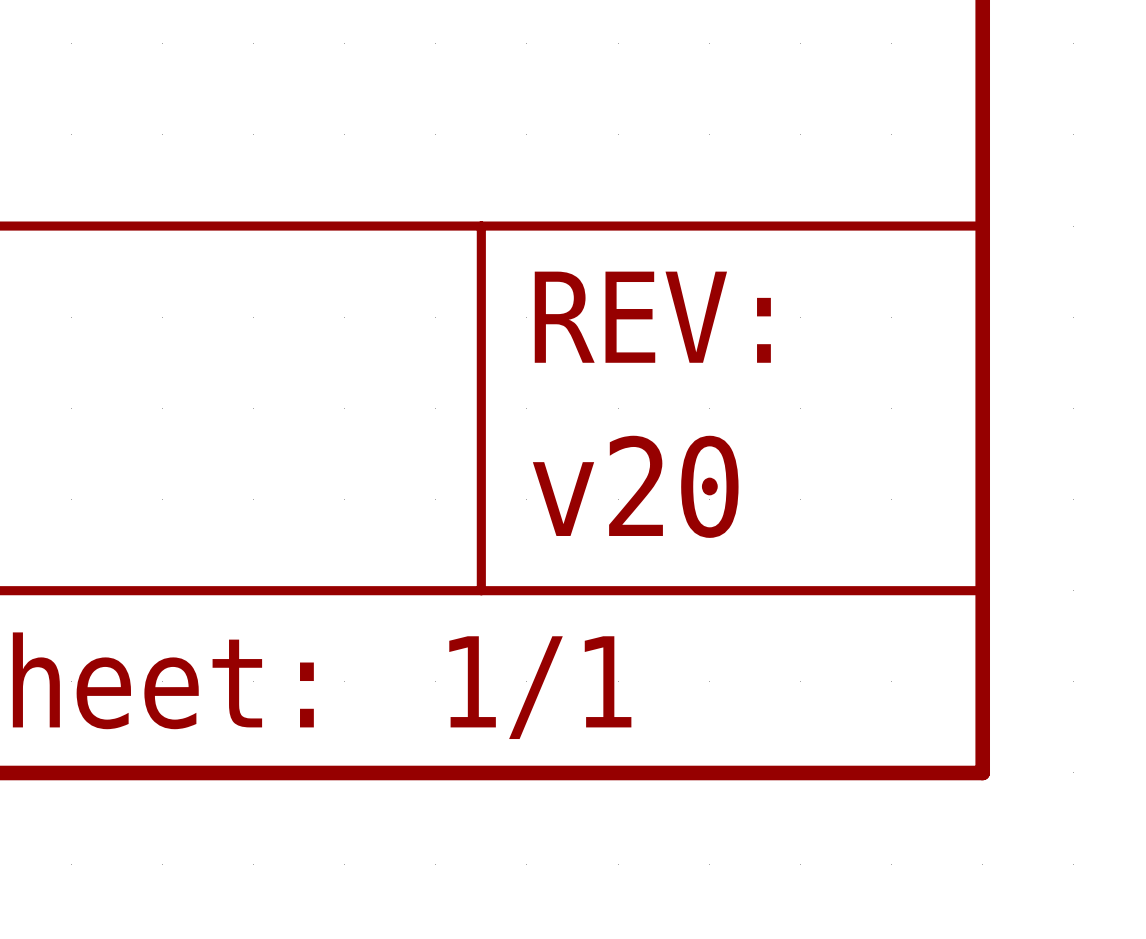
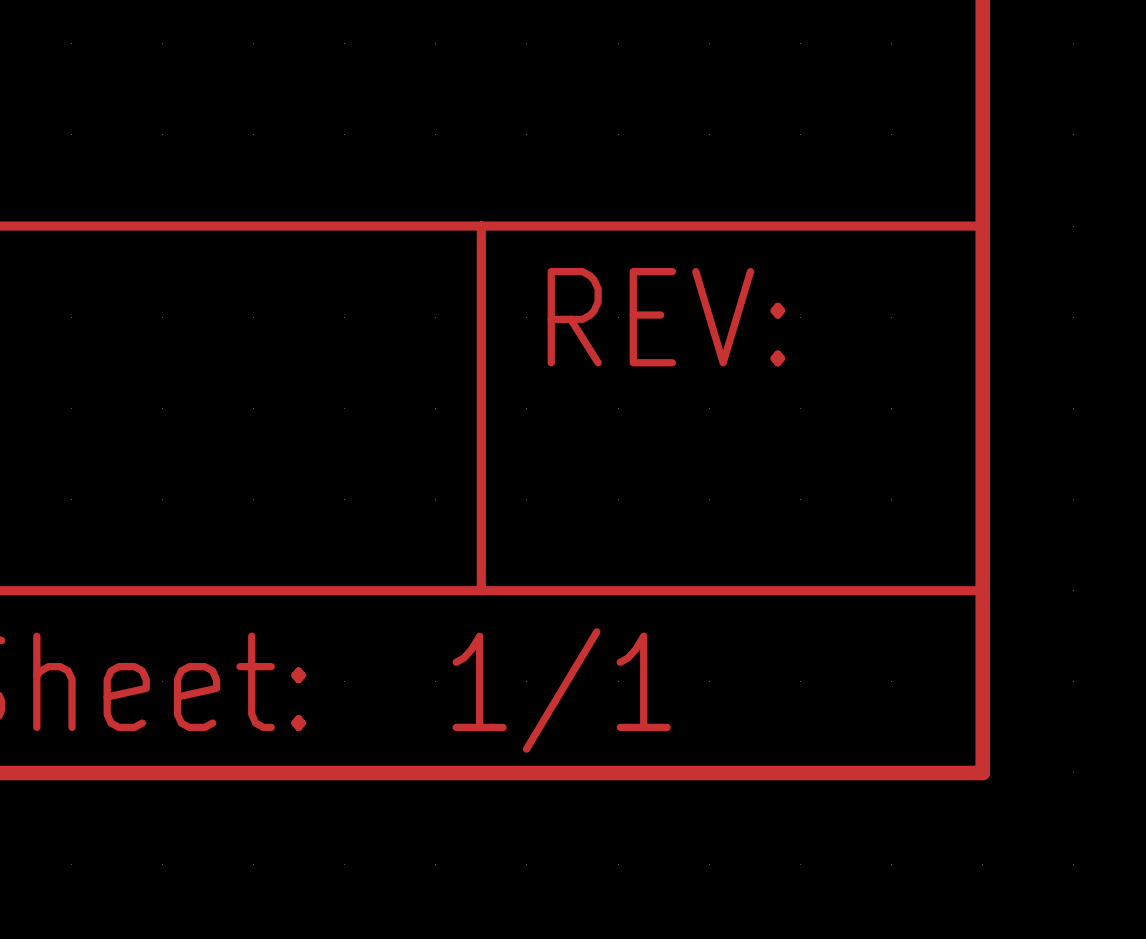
part text: v20 (635, 486) -> none

